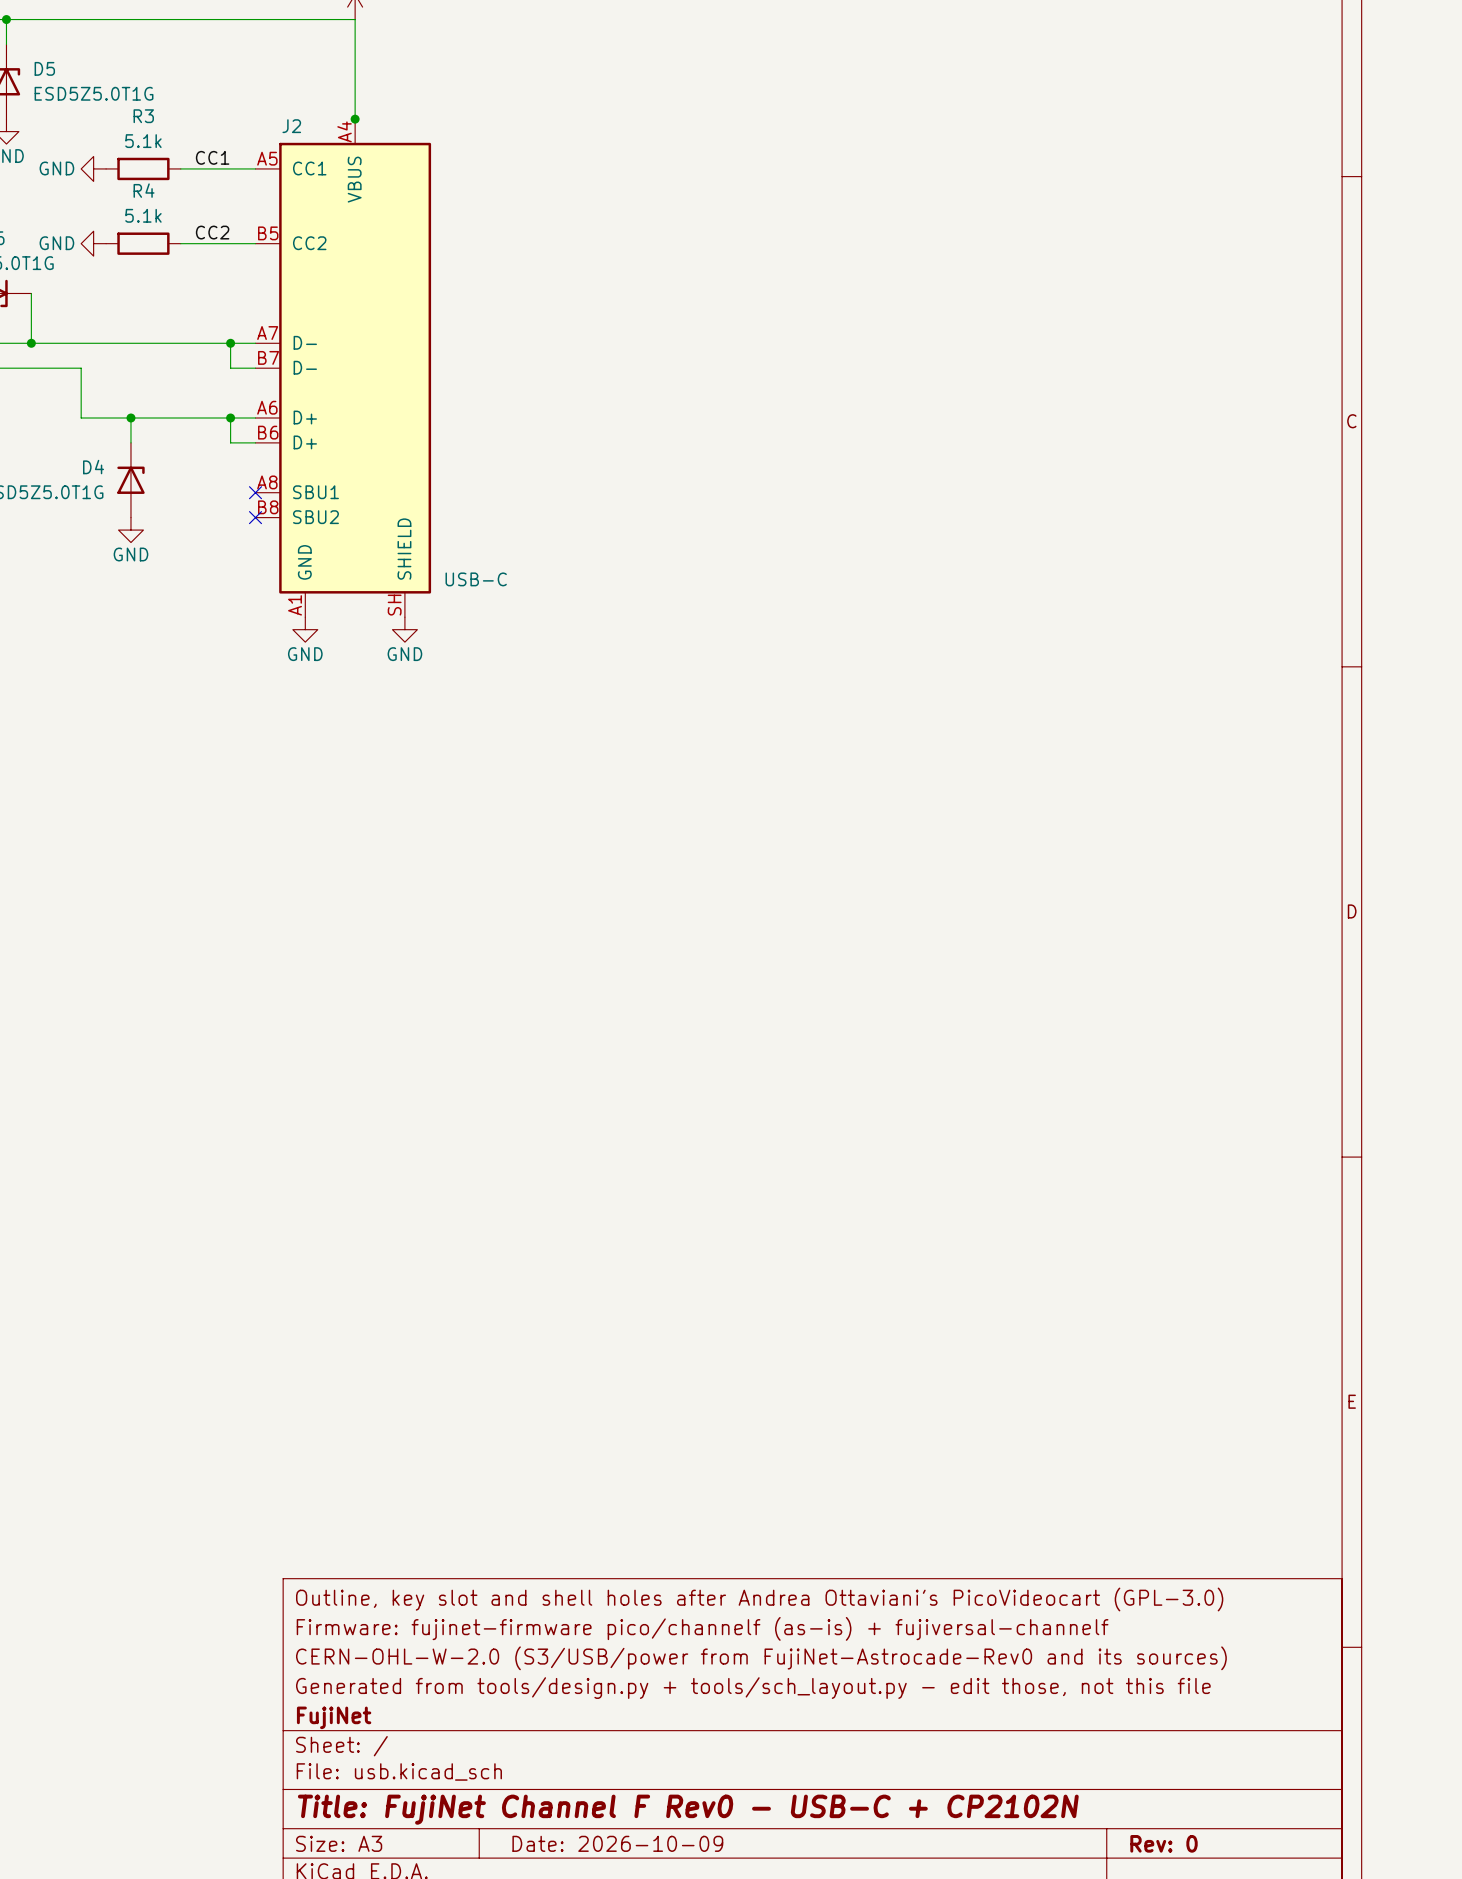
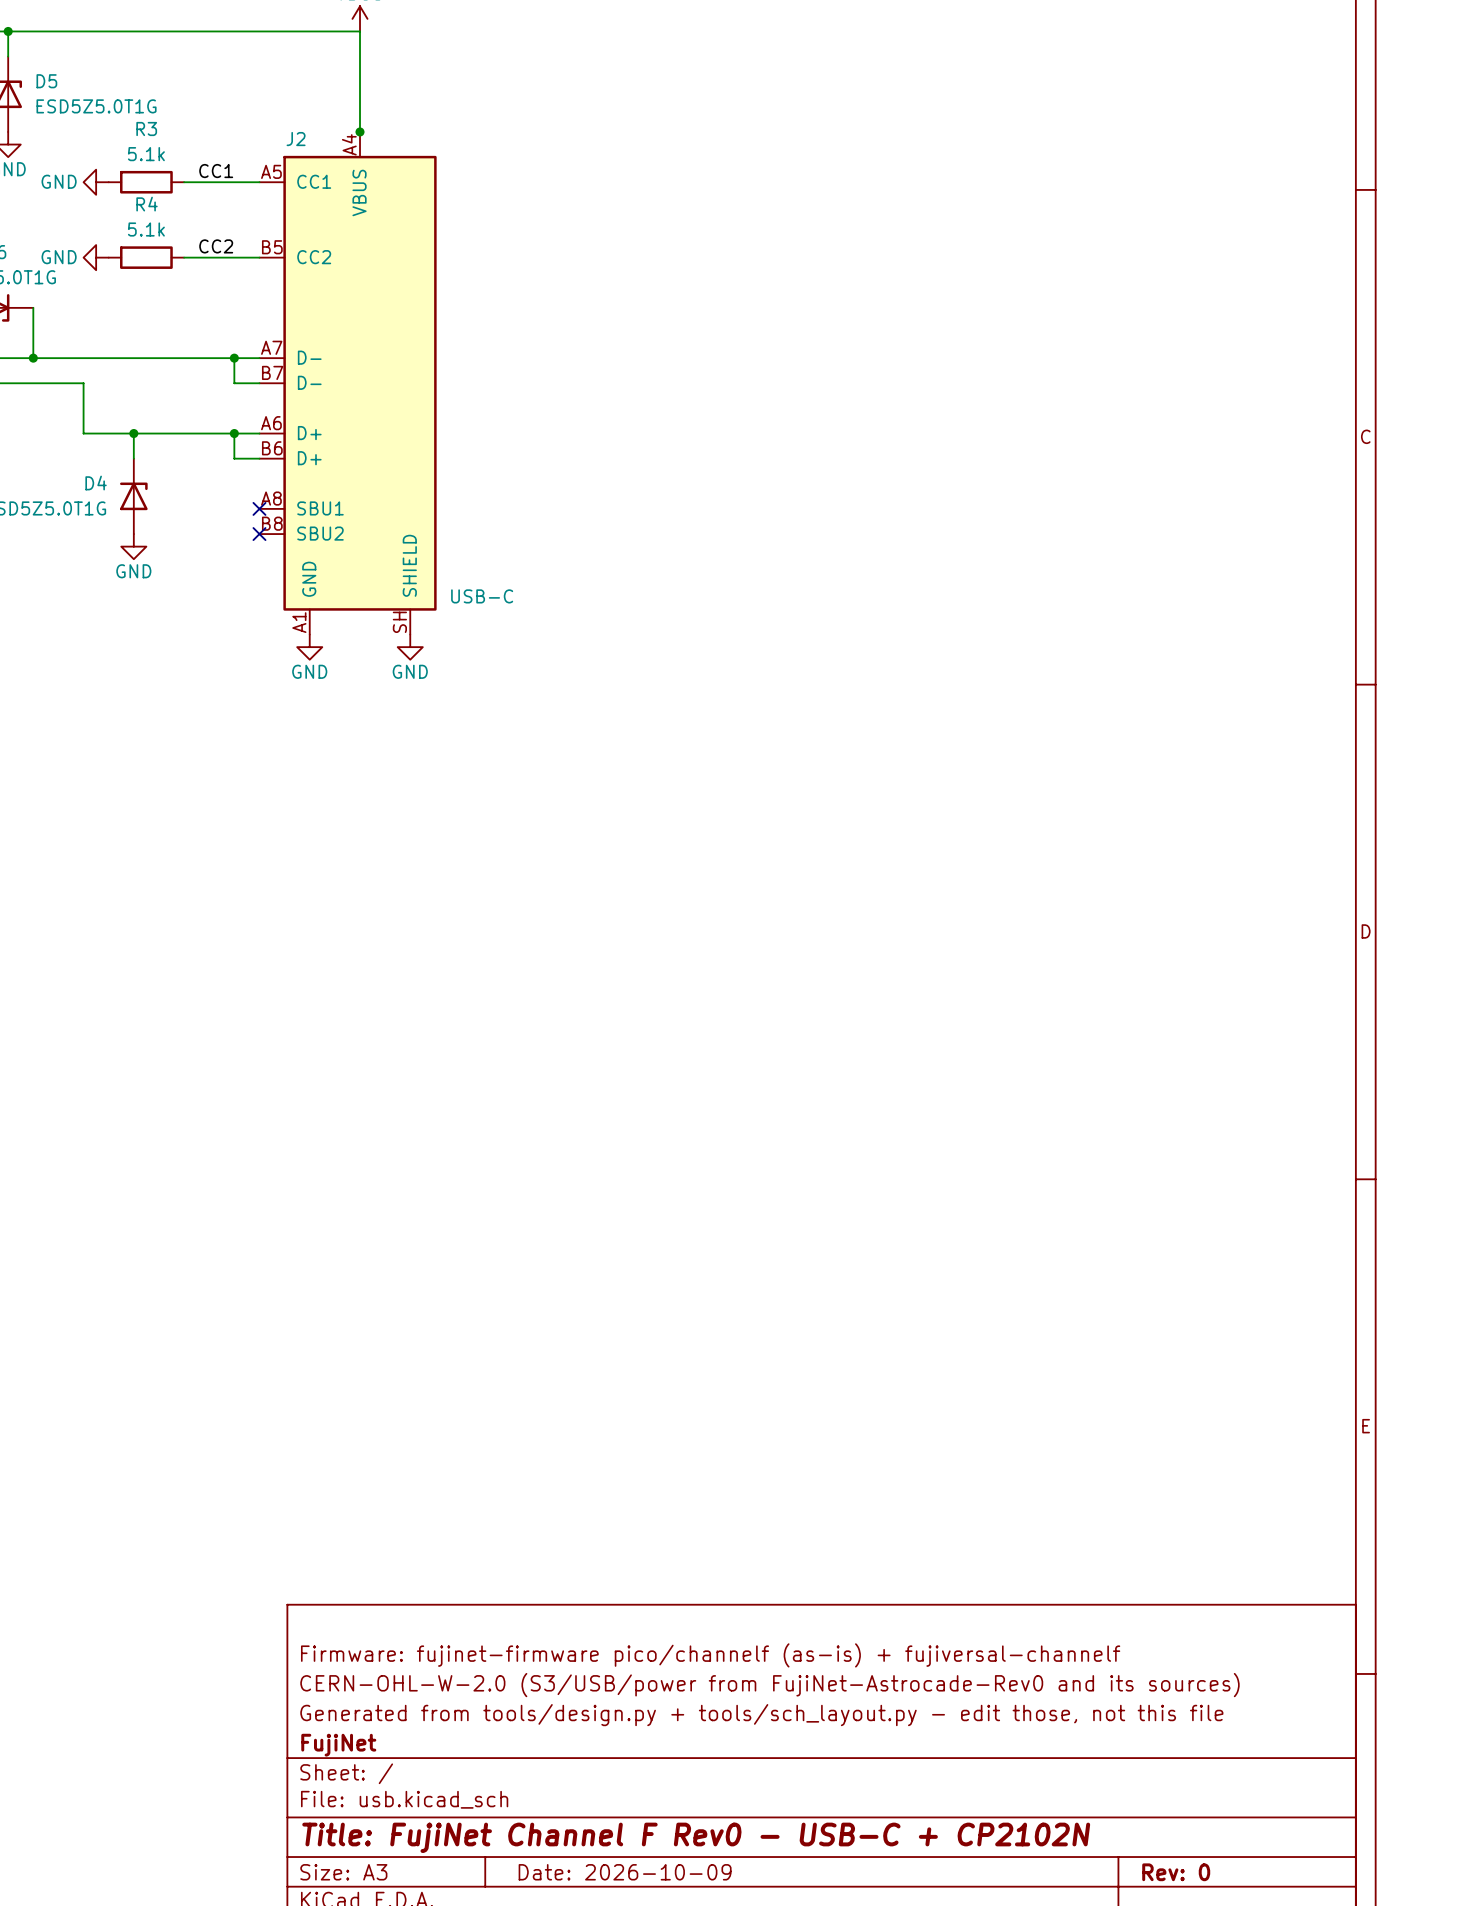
title block: Outline, key slot and shell holes after Andrea Ottaviani's PicoVideocart (GPL-3.0) (759, 1599) -> none

